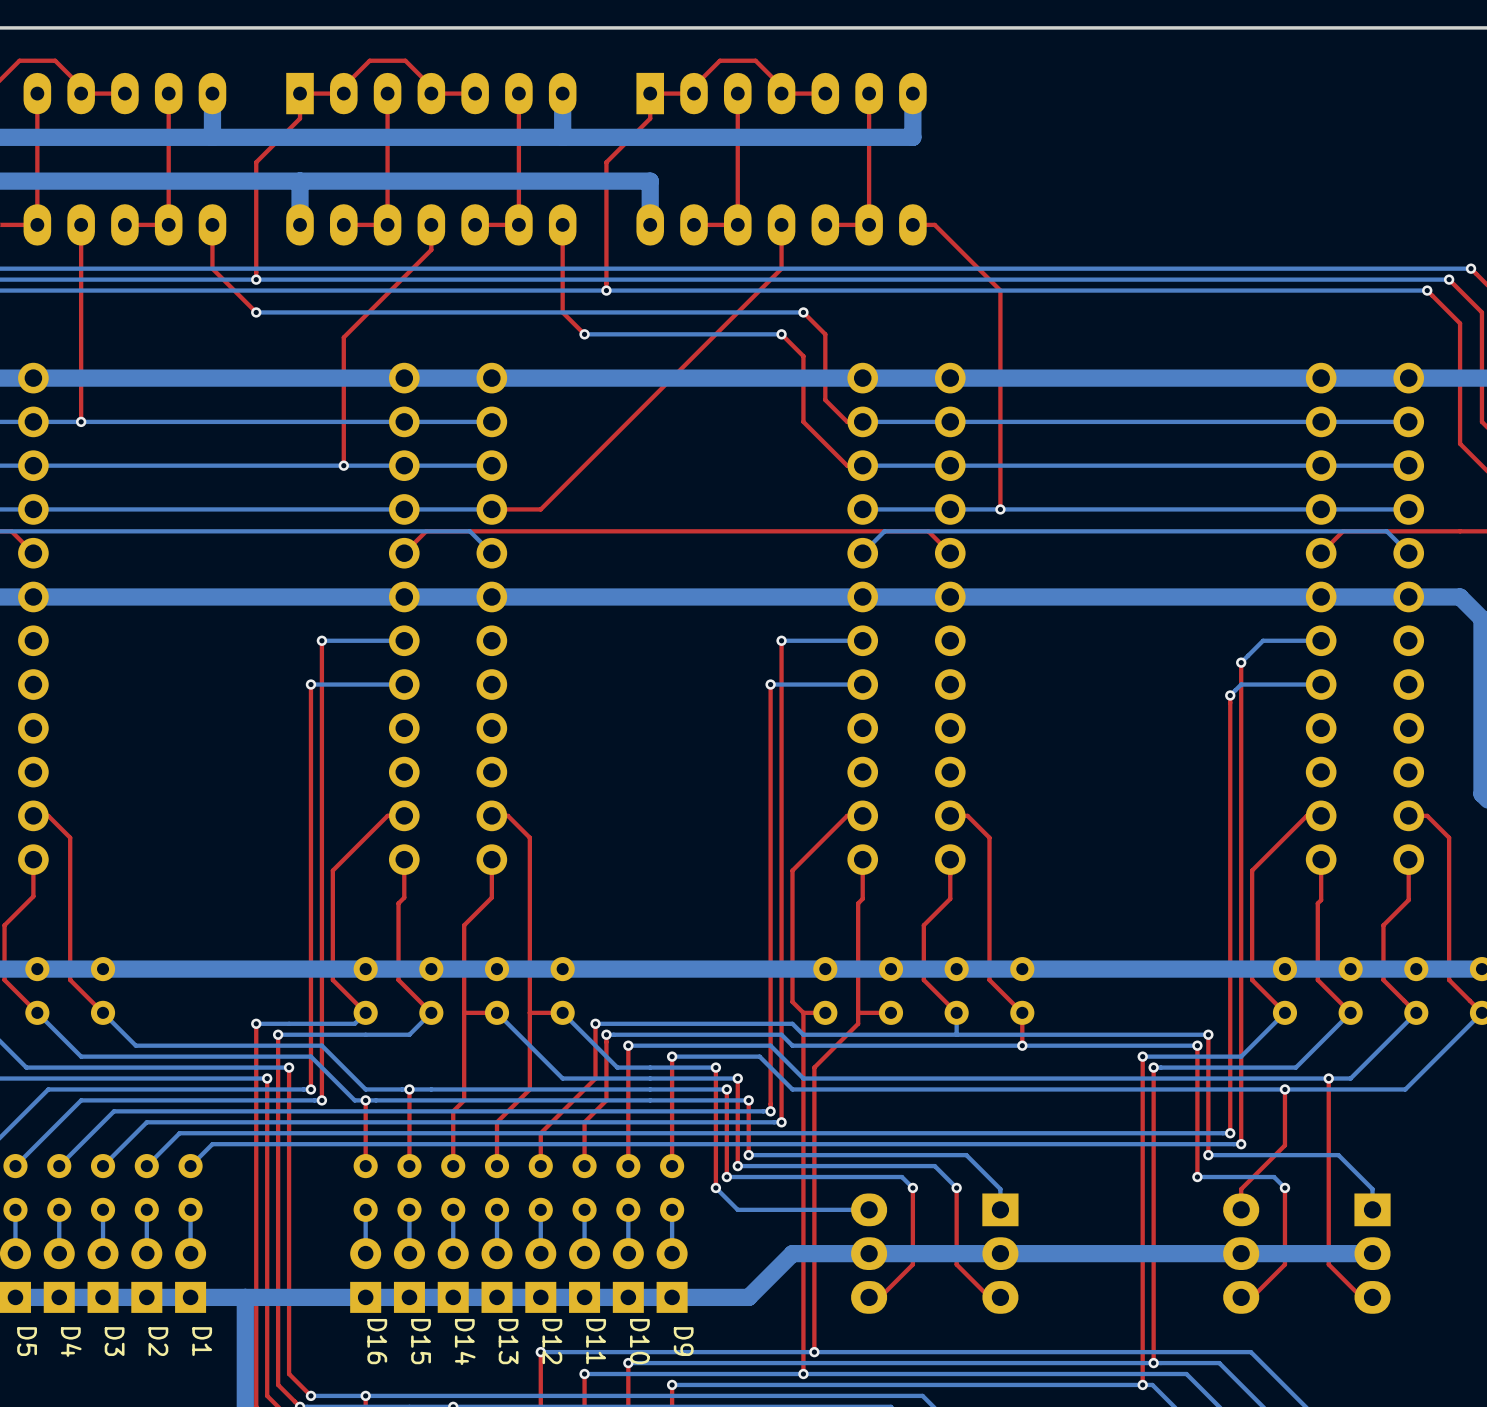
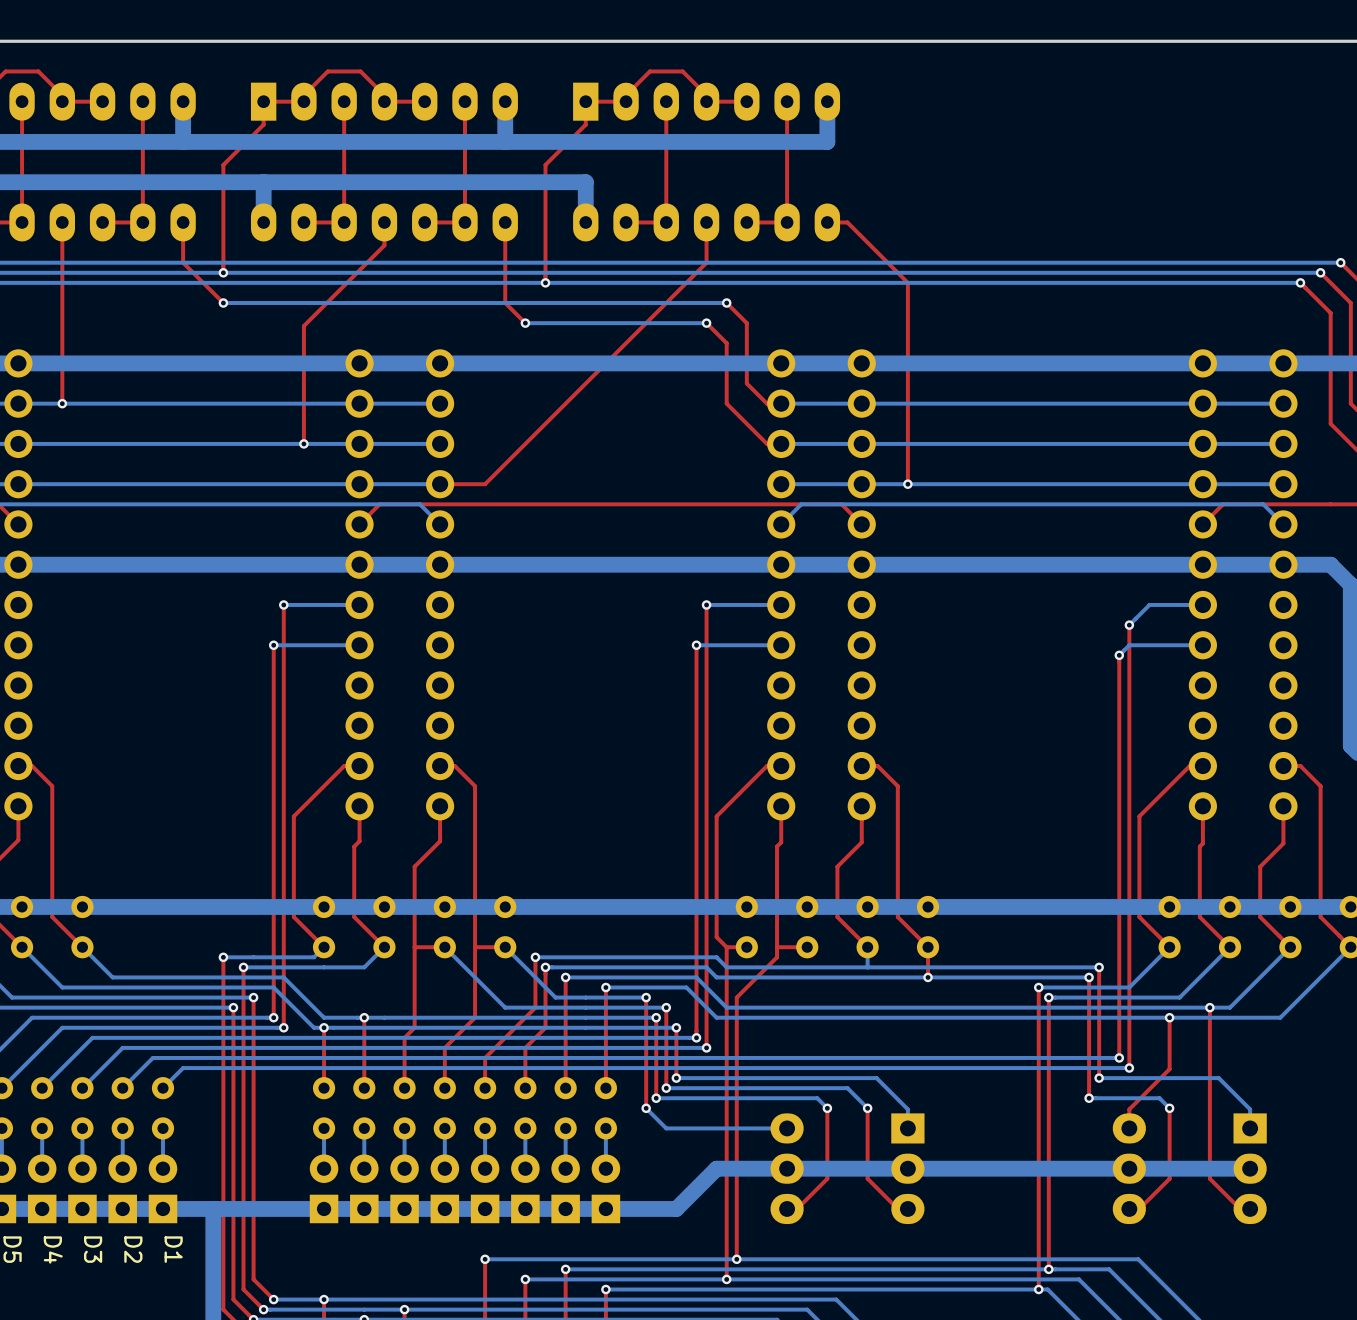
D16 name: D16 (377, 1341) -> none
D15 name: D15 (421, 1341) -> none
D13 name: D13 (508, 1341) -> none
D12 name: D12 (552, 1341) -> none
D11 name: D11 (596, 1341) -> none
D10 name: D10 (639, 1341) -> none
D9 name: D9 (683, 1341) -> none
D14 name: D14 (465, 1342) -> none

